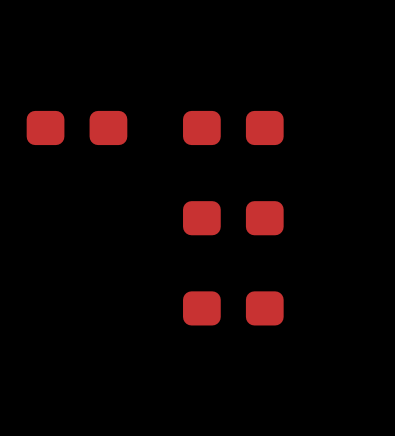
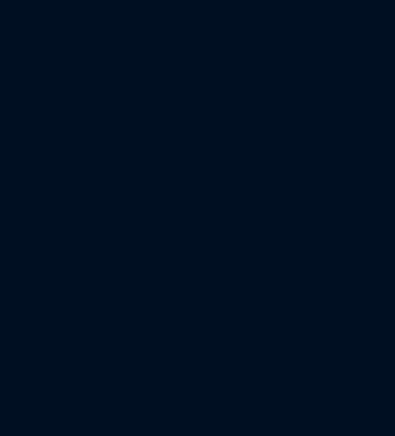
part: (76, 127) -> none
part: (233, 127) -> none
part: (233, 218) -> none
part: (233, 308) -> none

